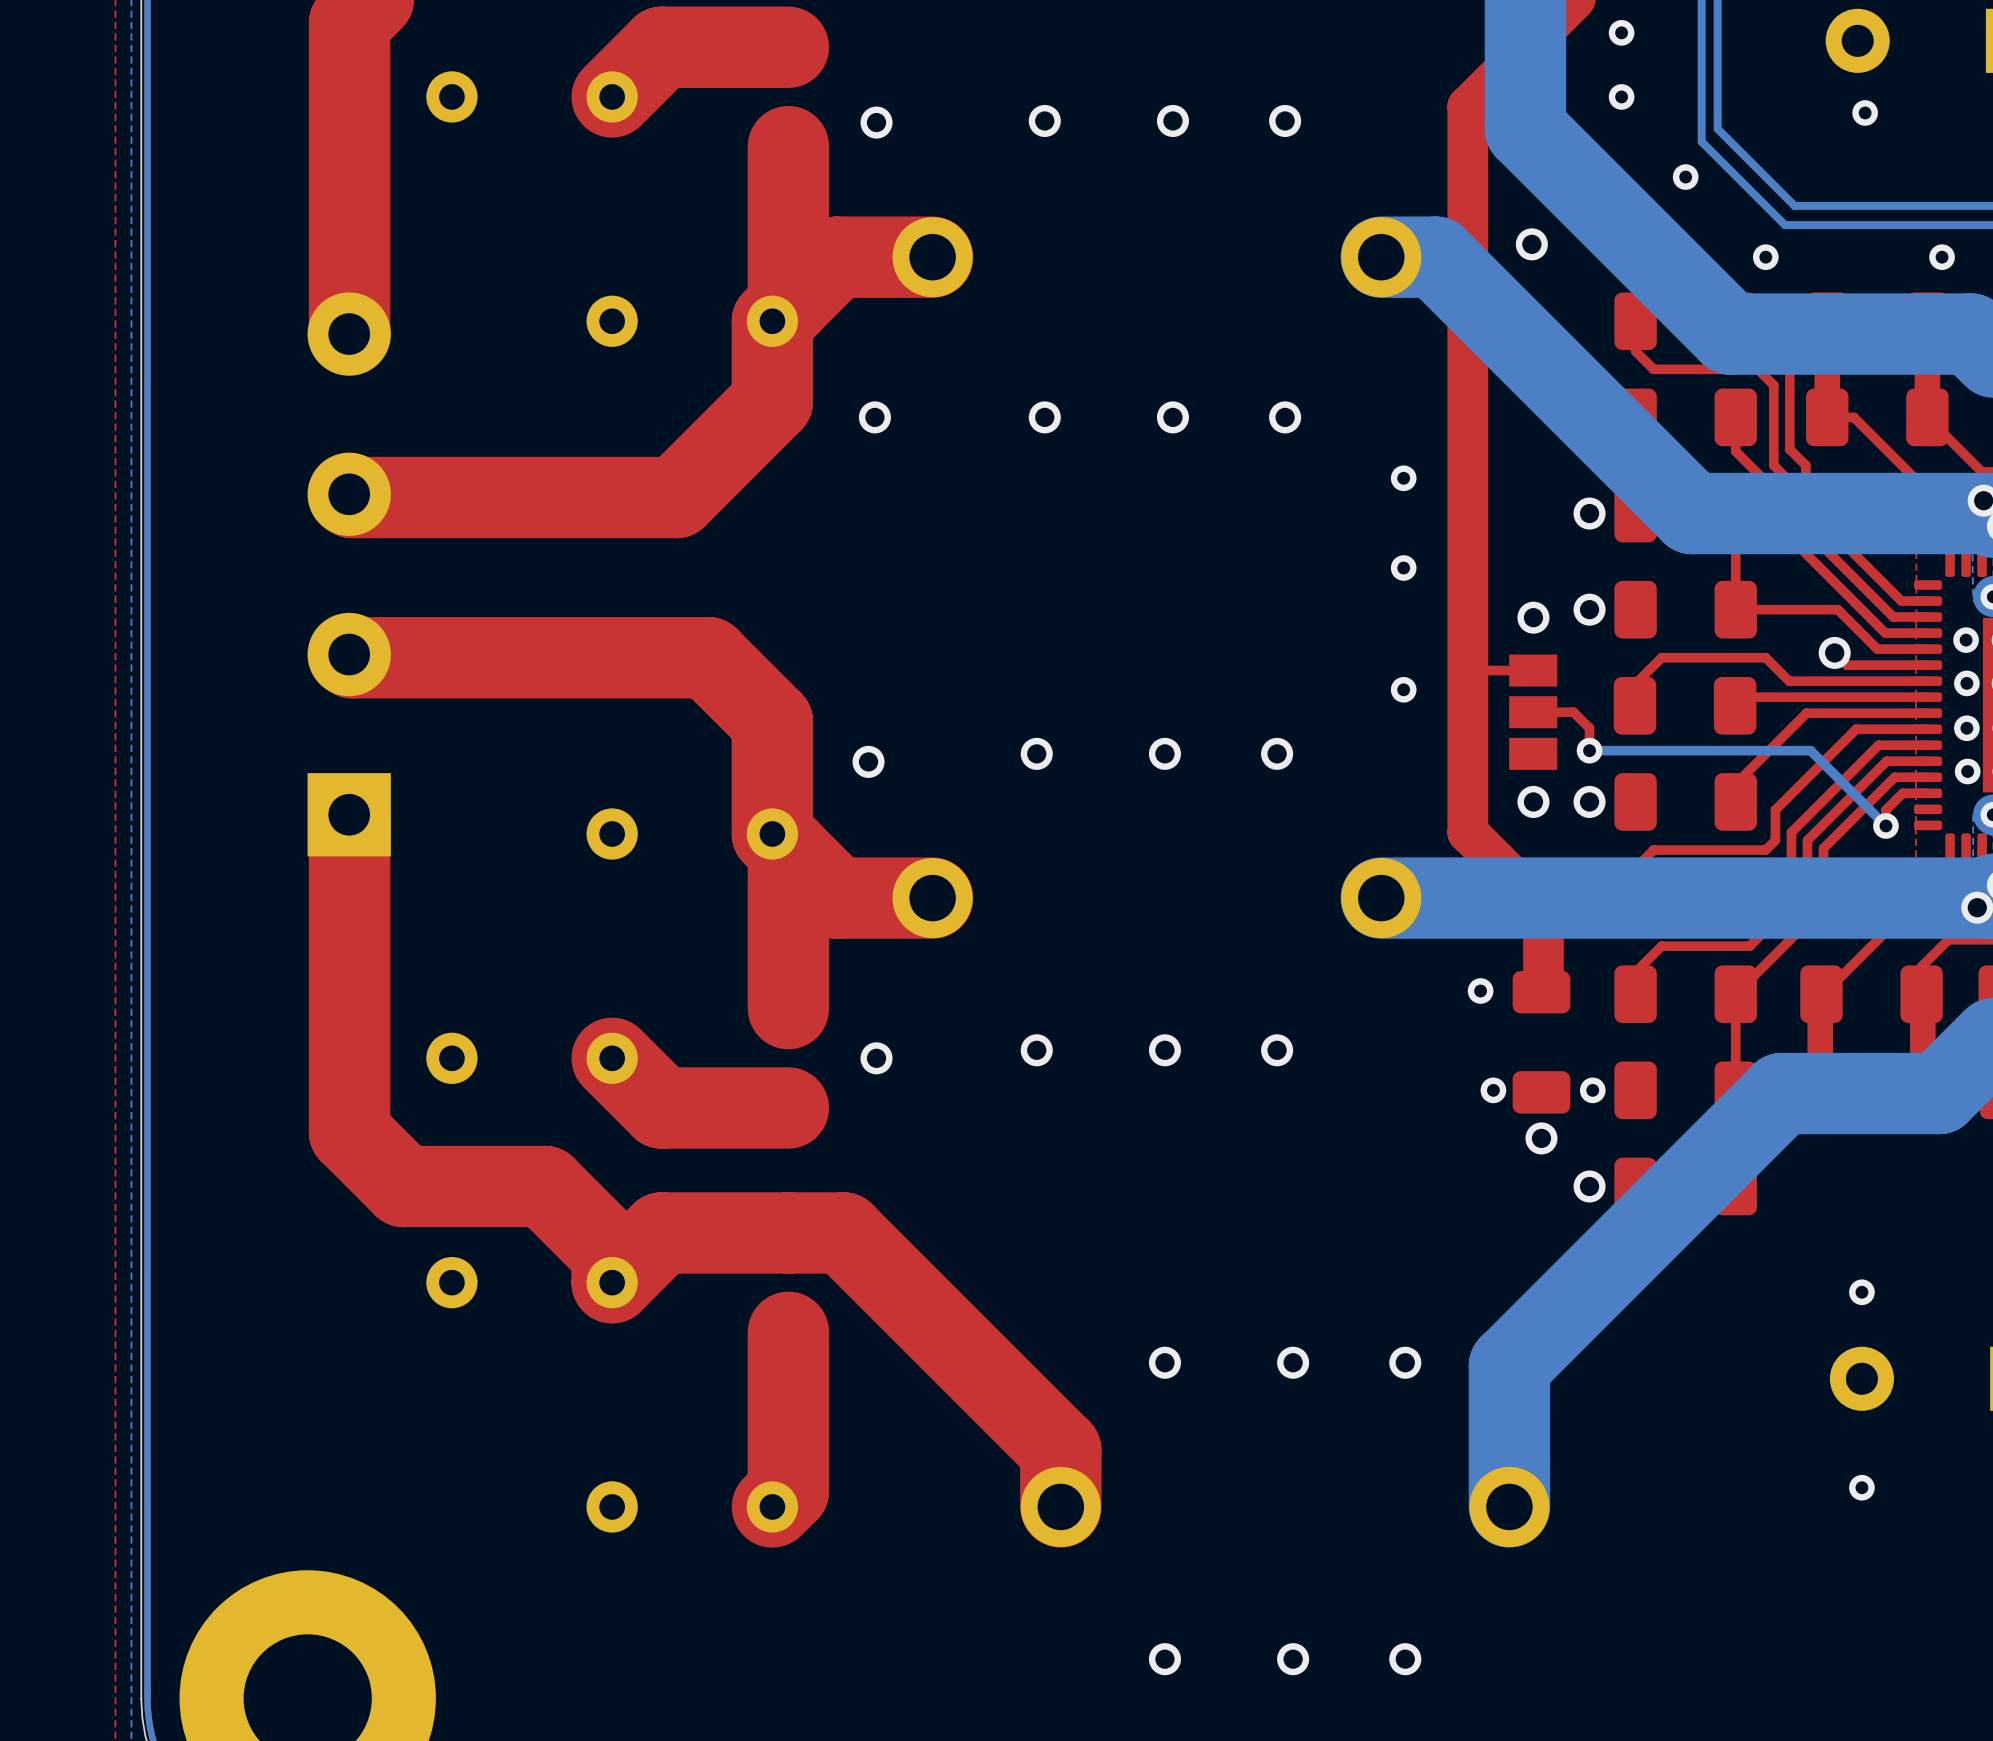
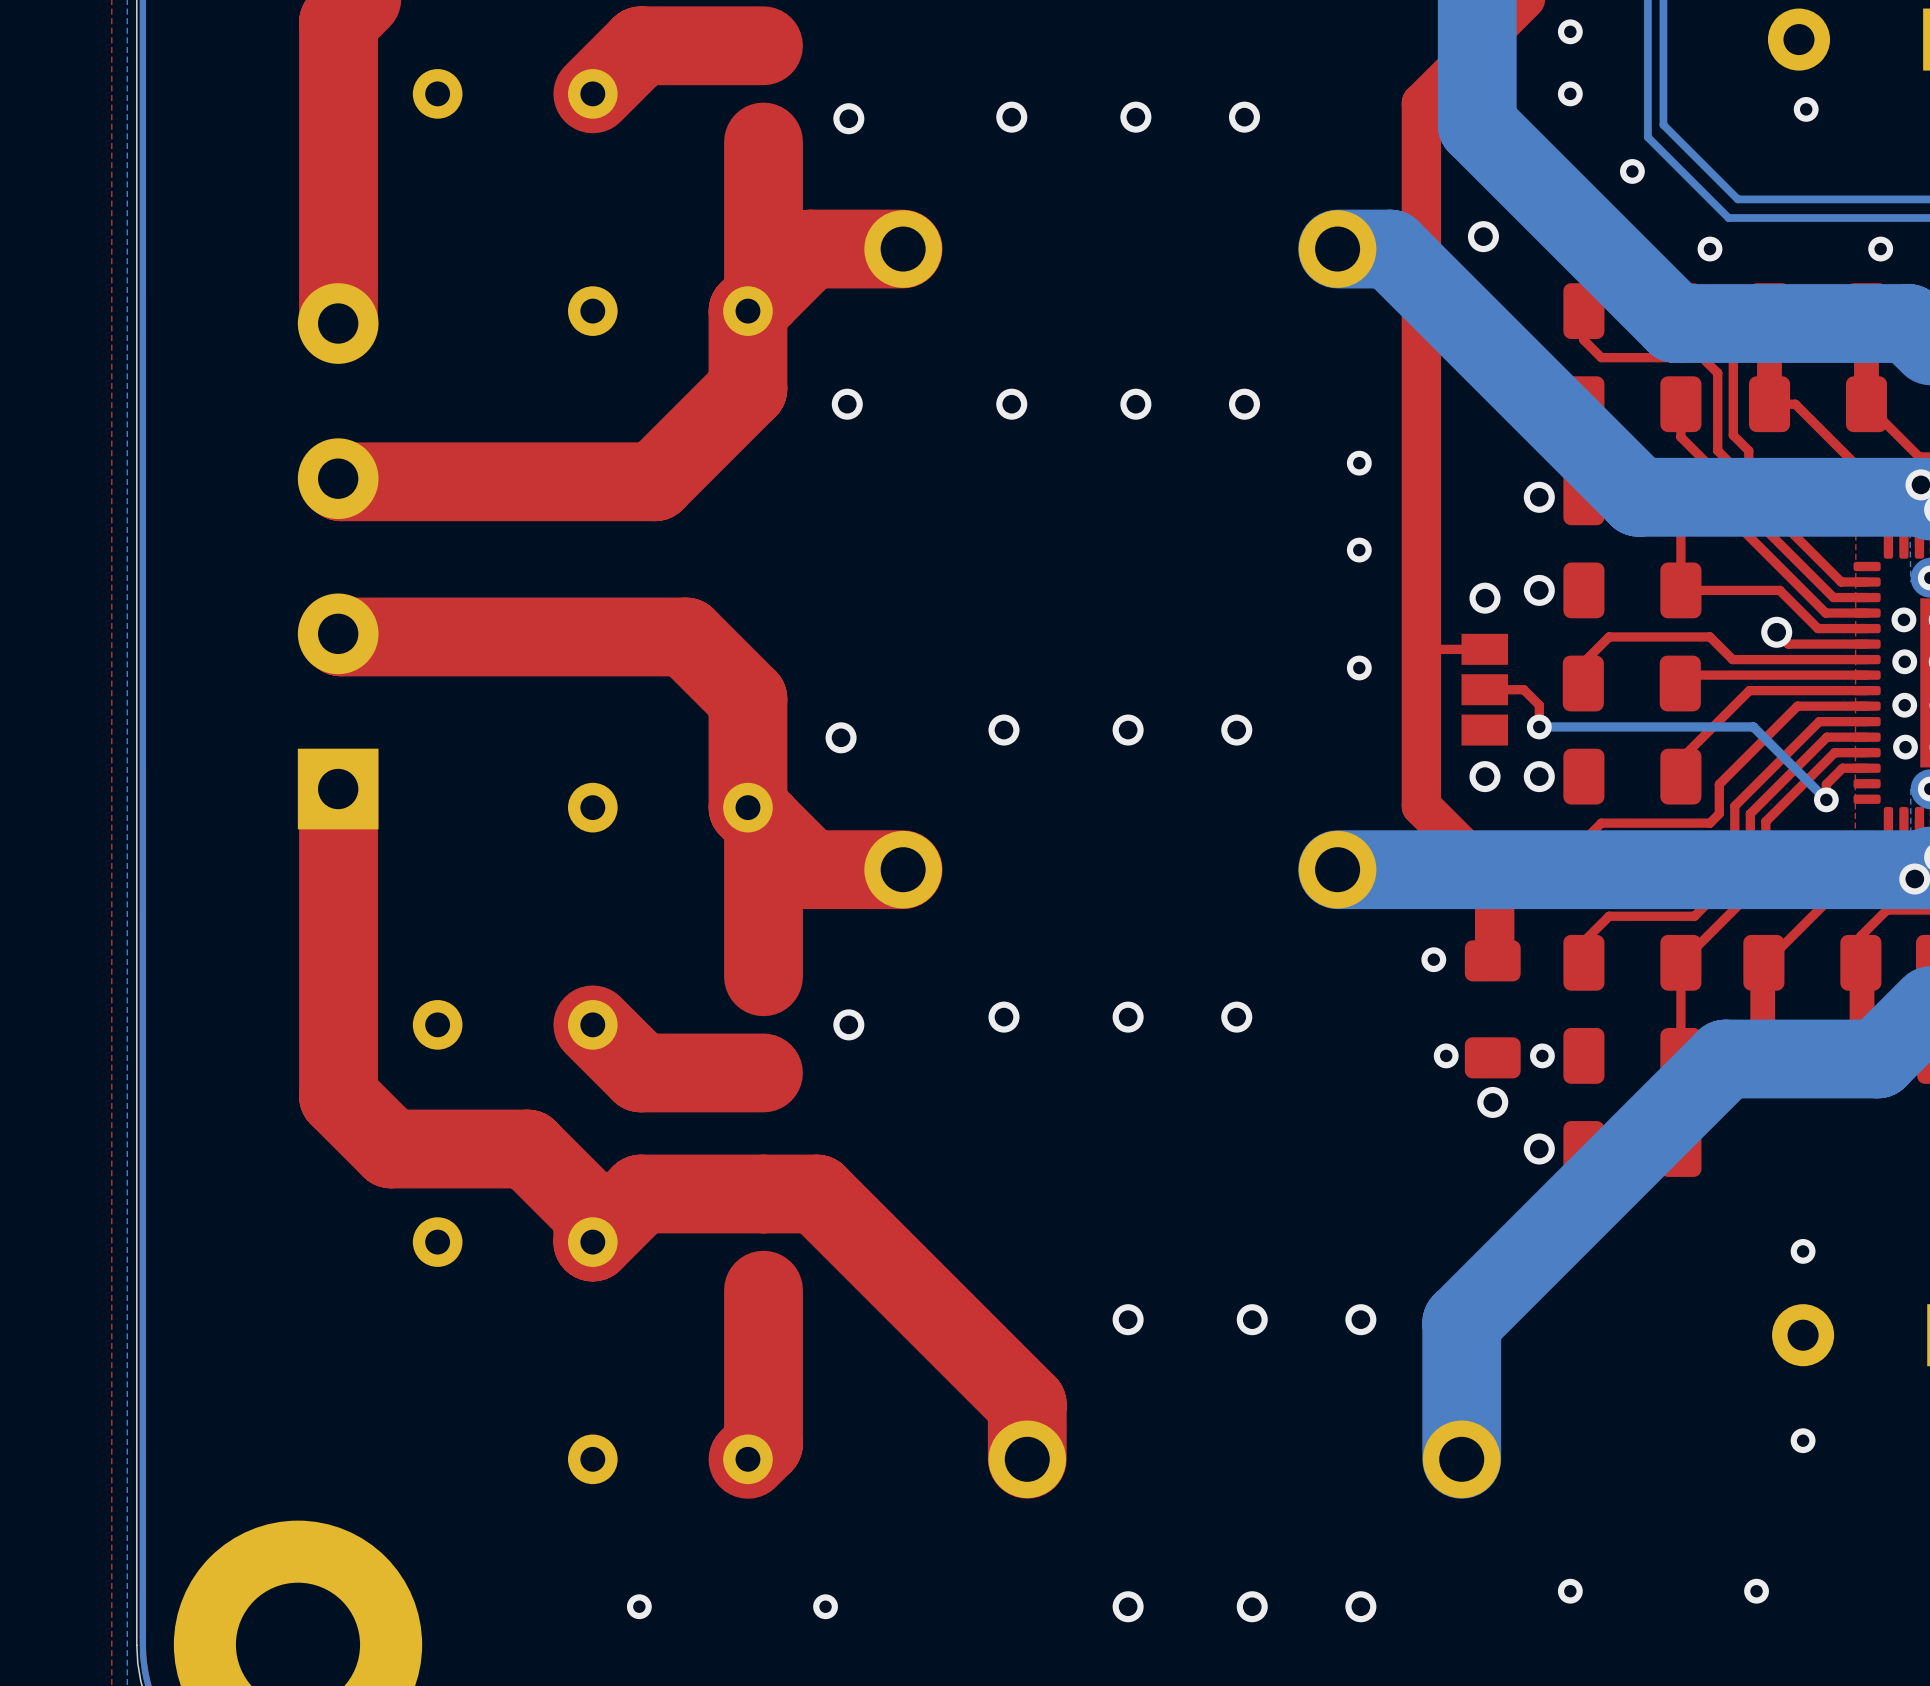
via: none -> (1570, 1591)
via: none -> (1756, 1591)
via: none -> (639, 1606)
via: none -> (825, 1606)

